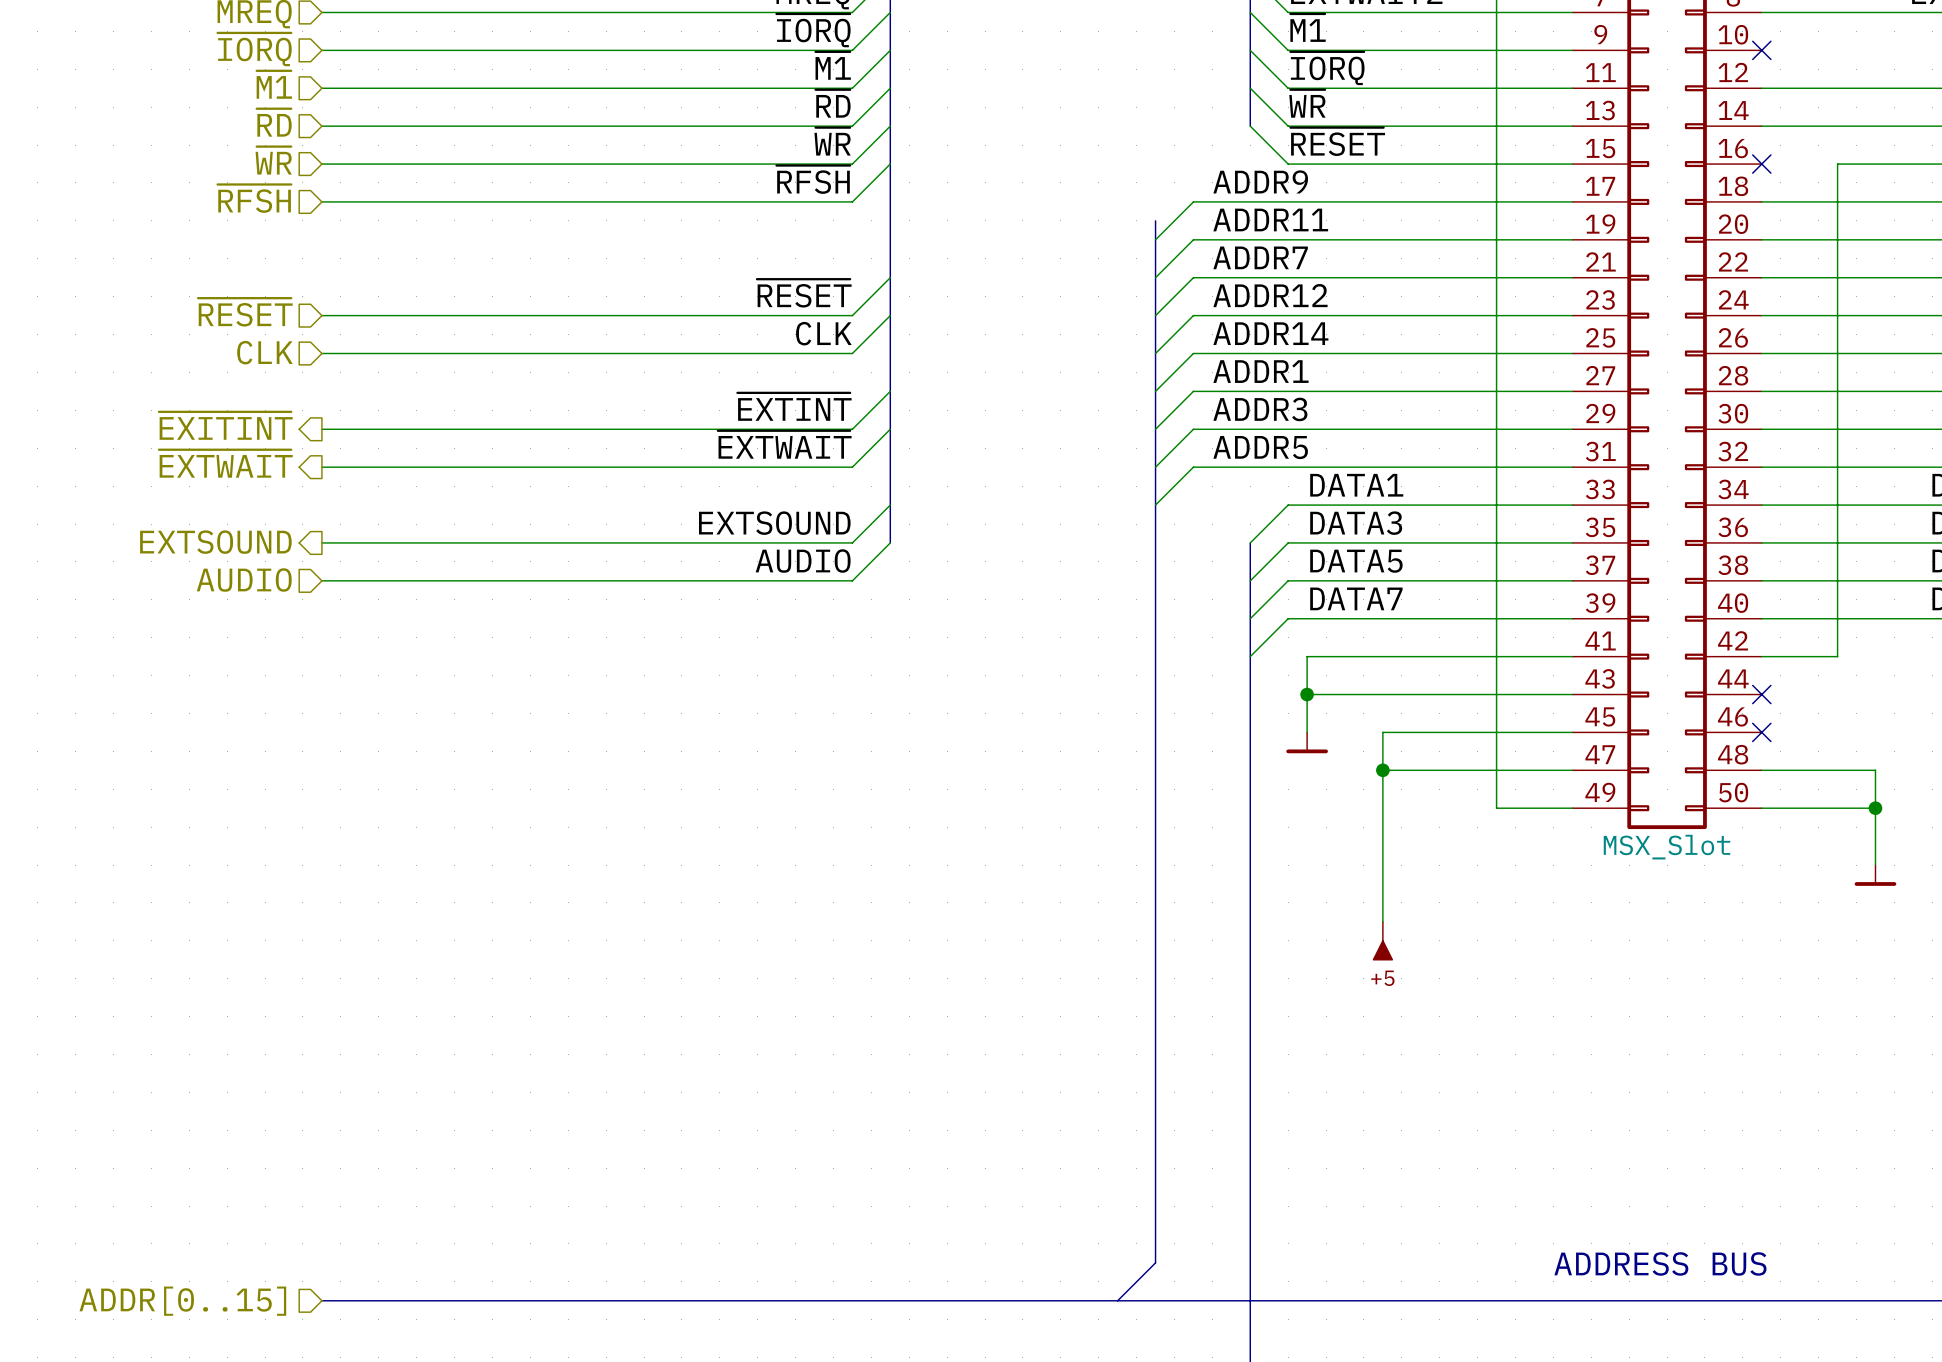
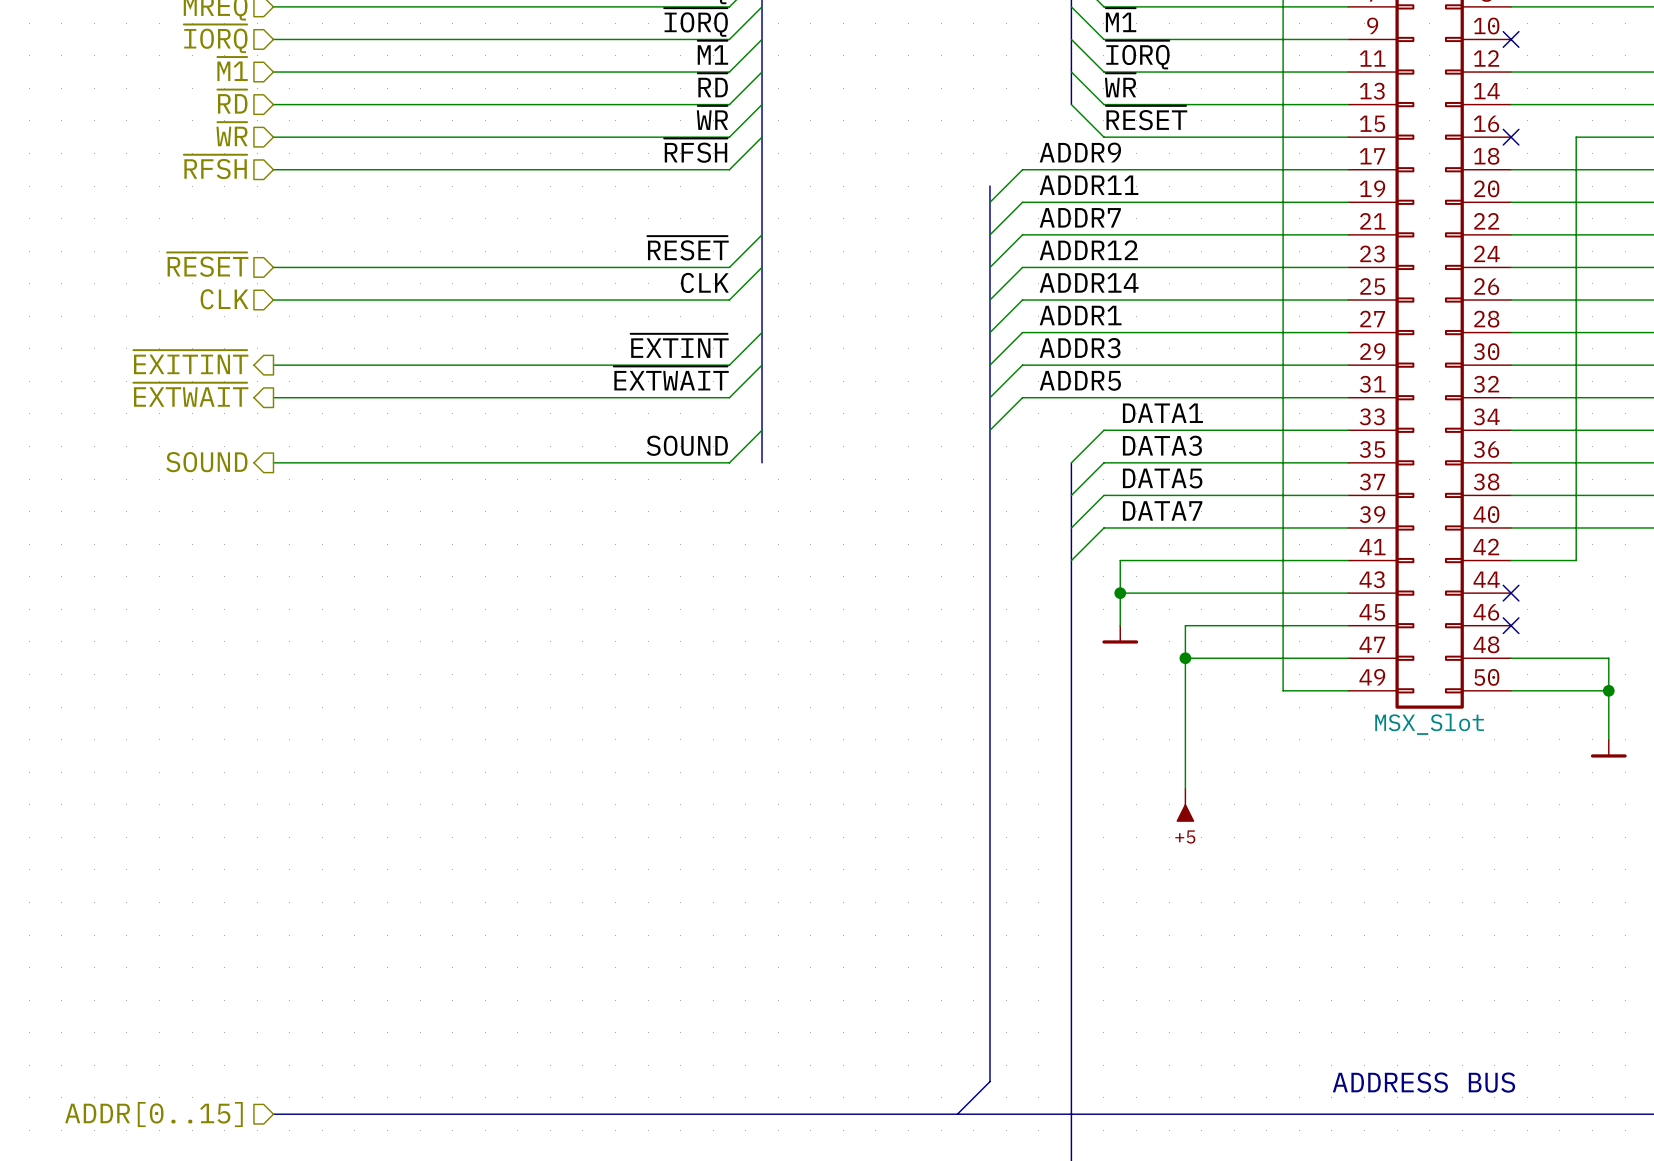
label: EXTSOUND (774, 523) -> SOUND (687, 445)
hierarchical label: EXTSOUND (215, 542) -> SOUND (206, 462)
wire: (890, 542) (852, 580) (321, 580) -> none
label: AUDIO (803, 561) -> none
hierarchical label: AUDIO (244, 580) -> none

